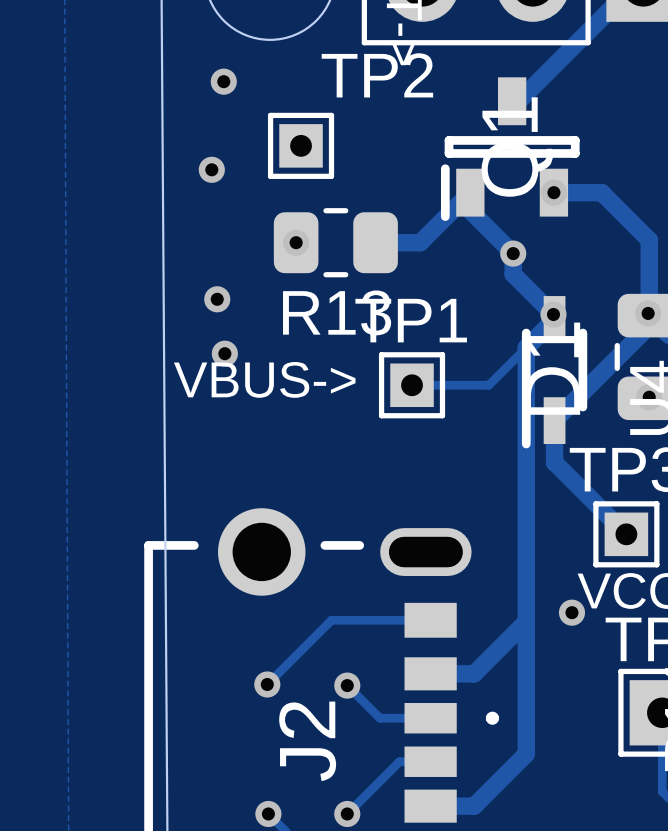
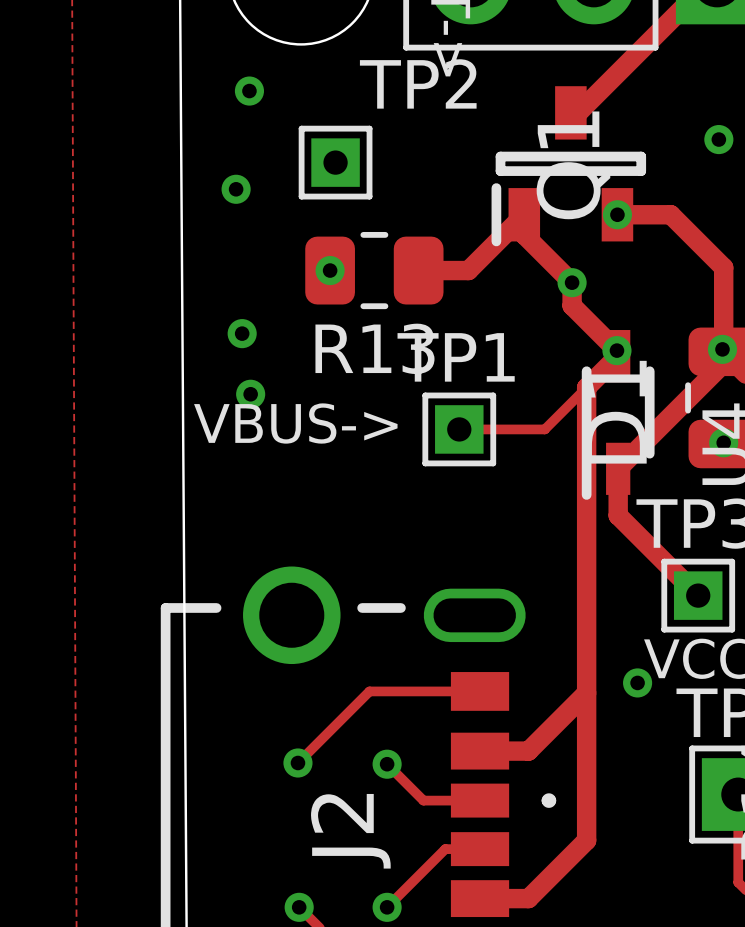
via: none -> (718, 139)

